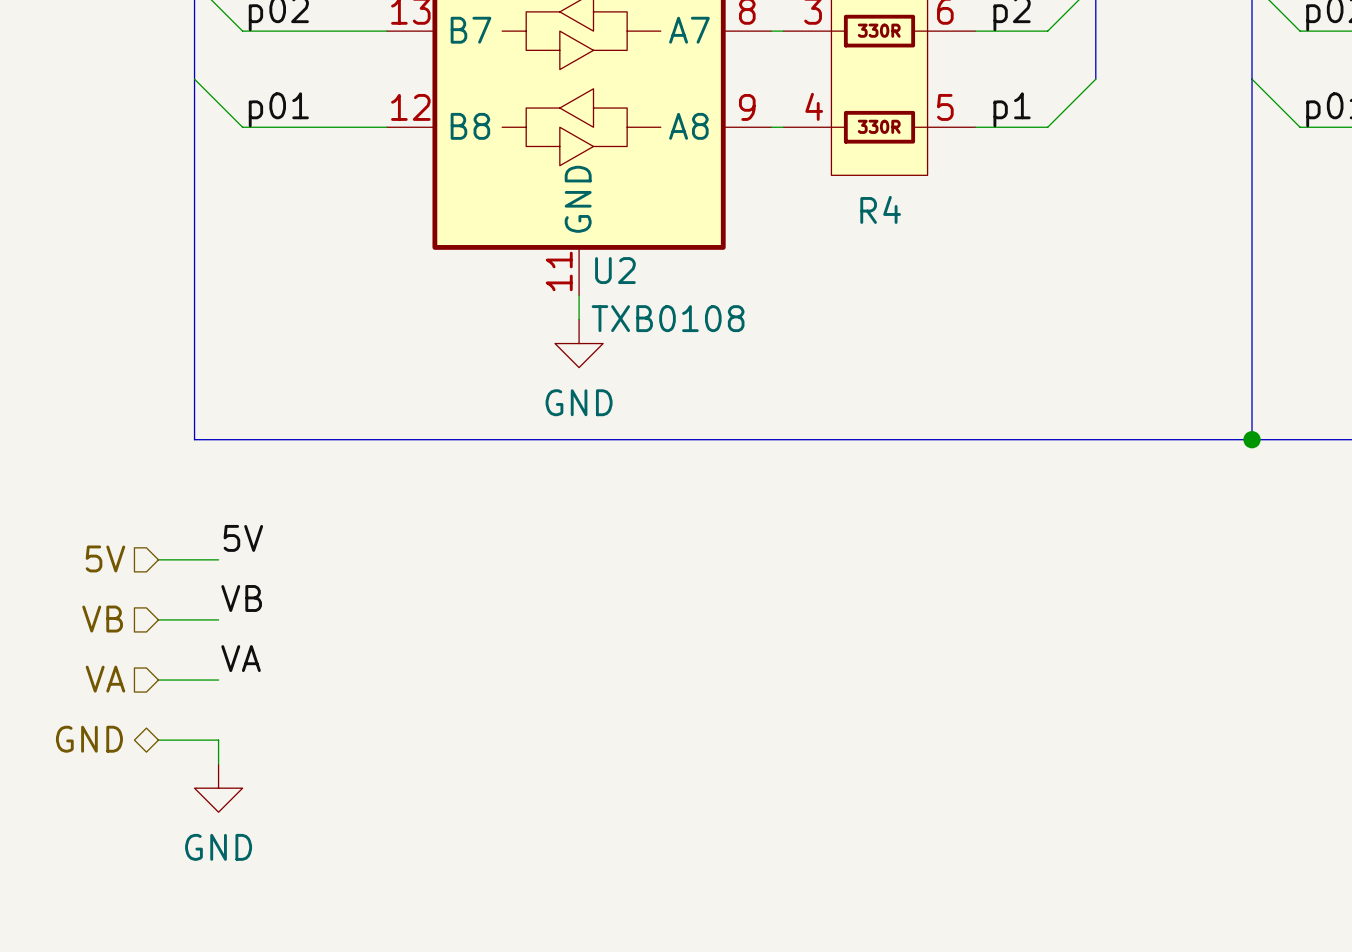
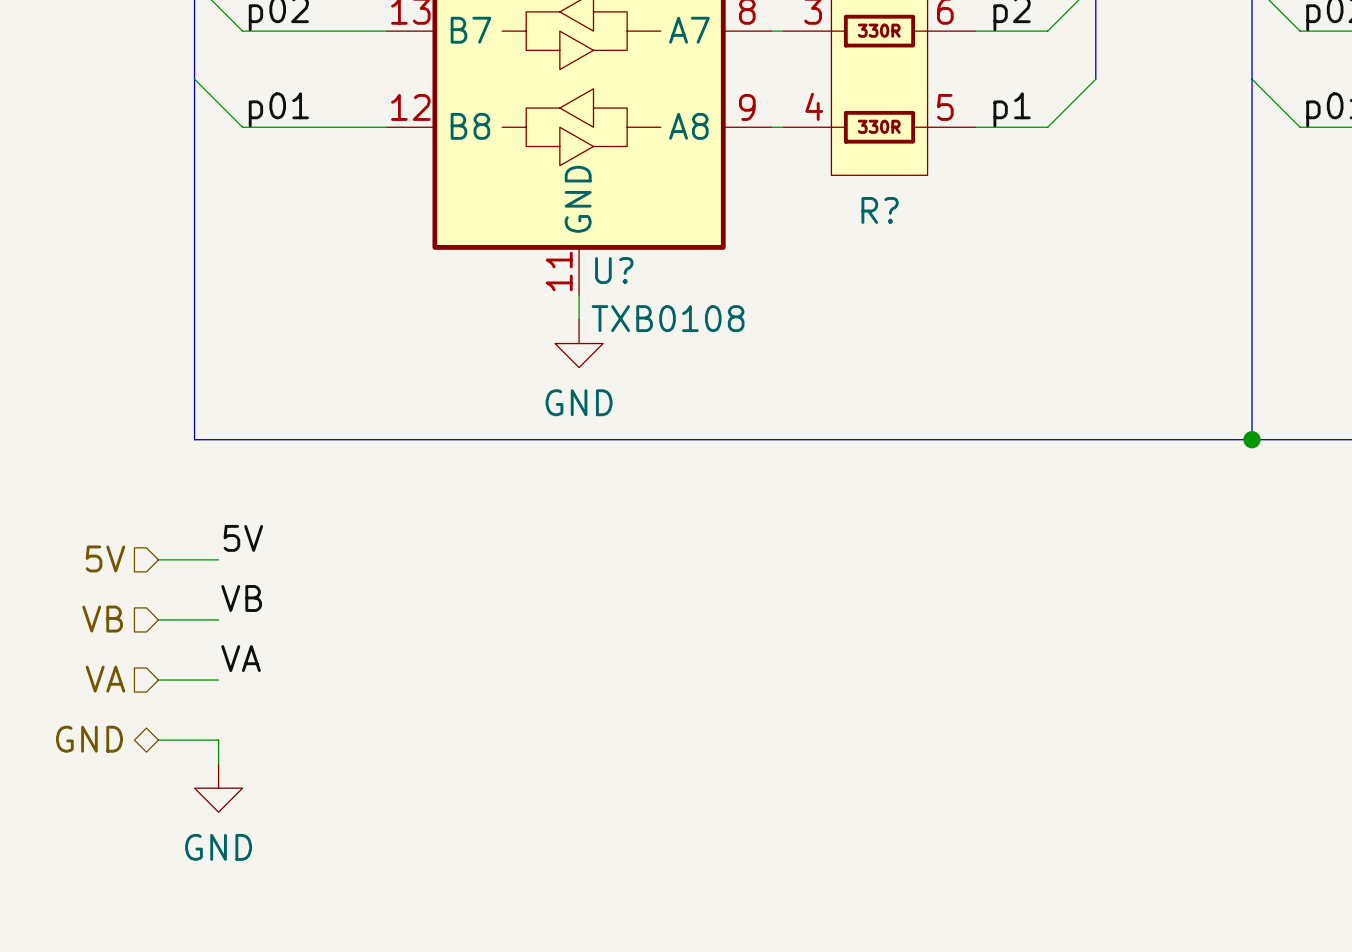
R4 name: R4 (880, 209) -> R? (880, 210)
U2 name: U2 (615, 270) -> U? (614, 270)

